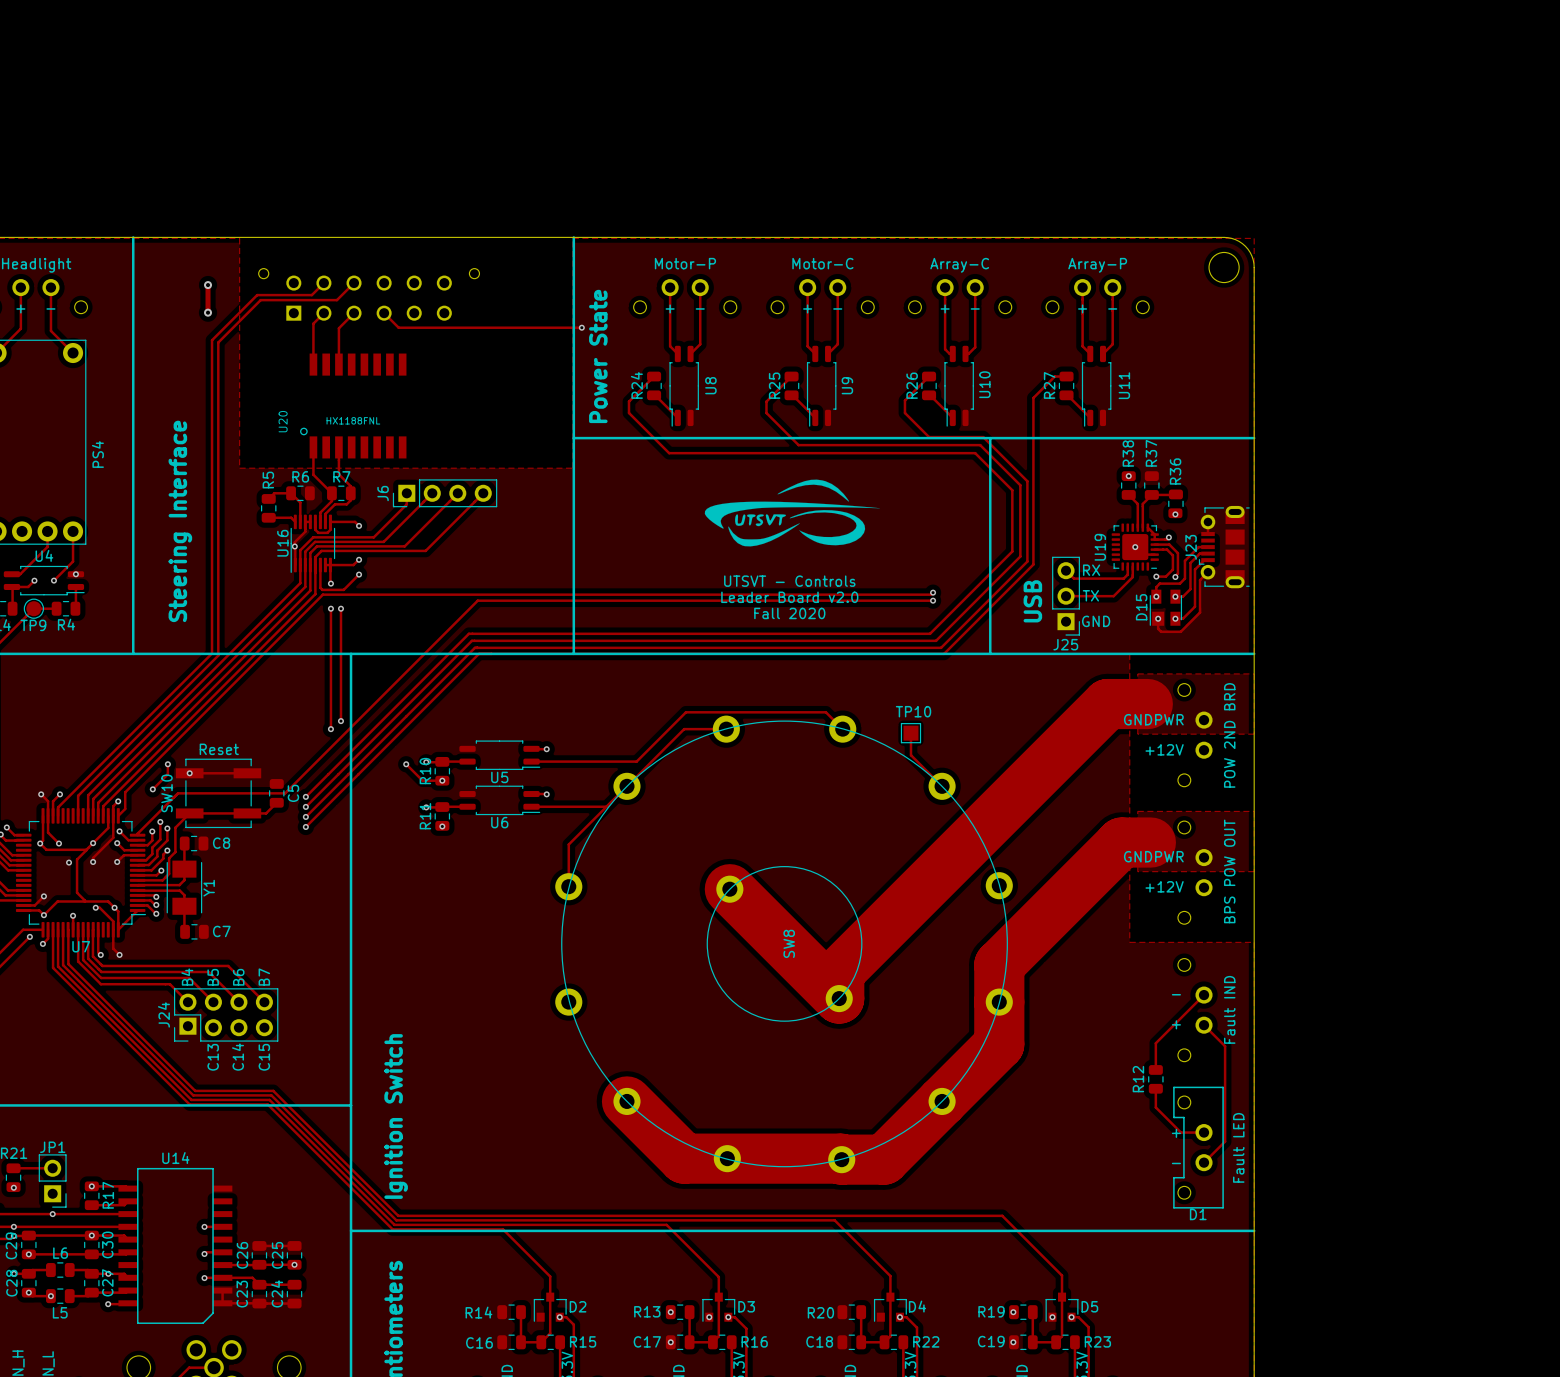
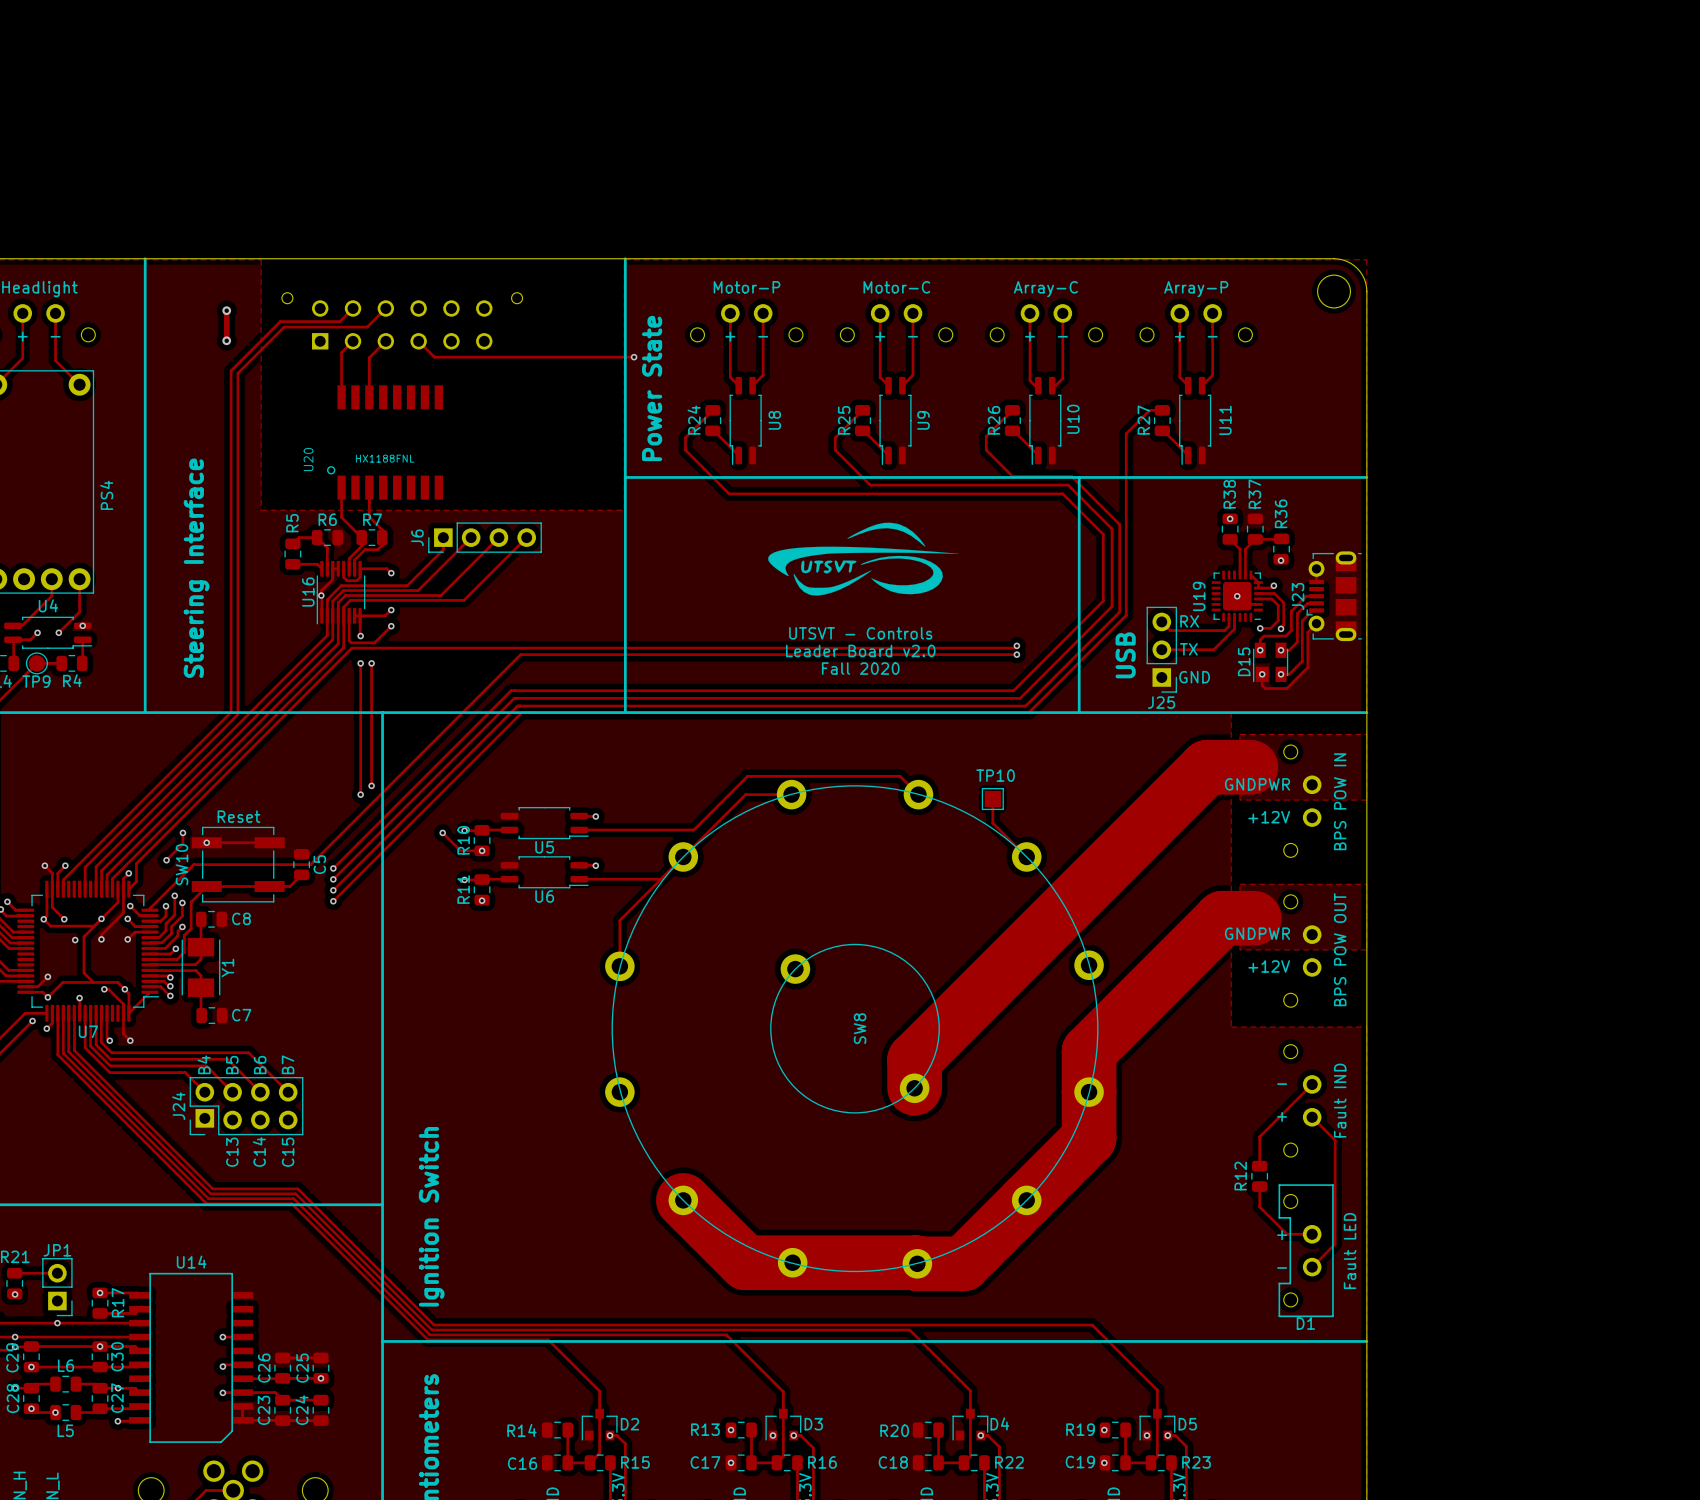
text: POW 2ND BRD (1229, 735) -> BPS POW IN (1340, 801)
track: (729, 889) (839, 998) -> none

